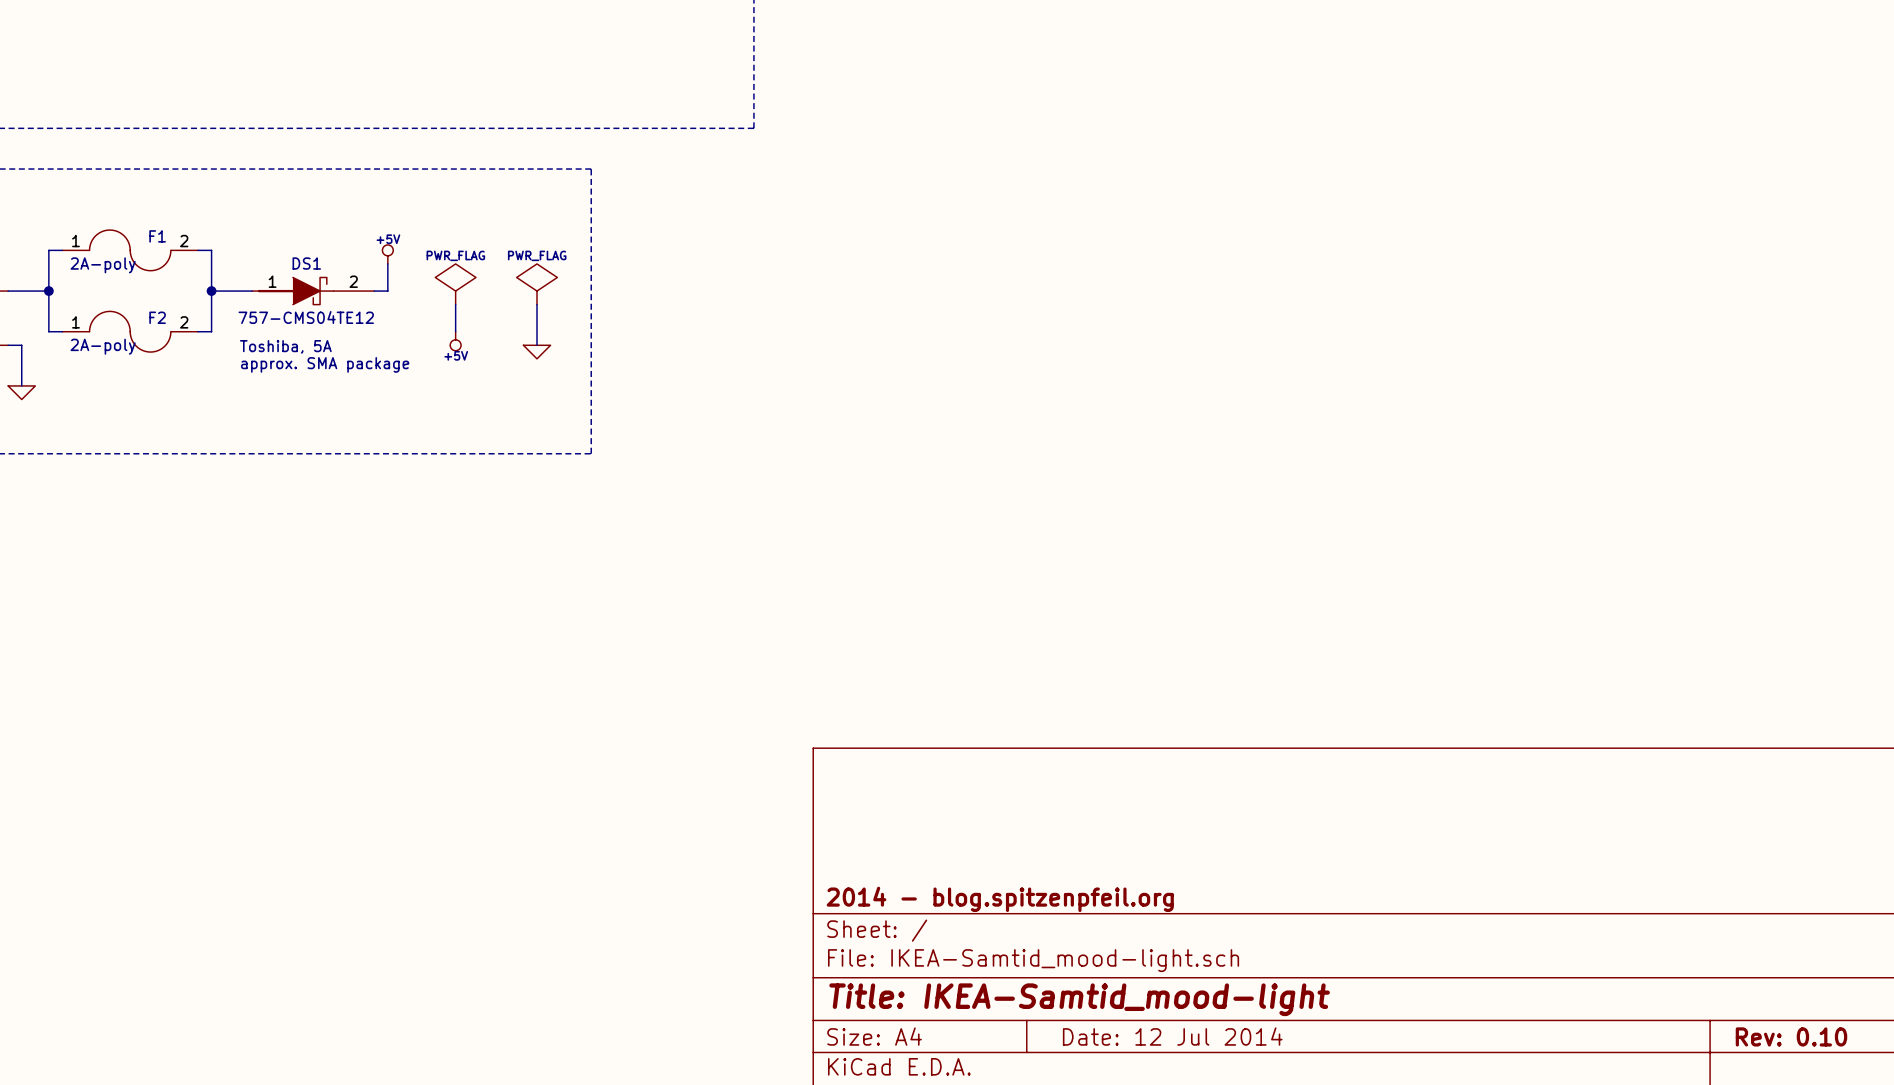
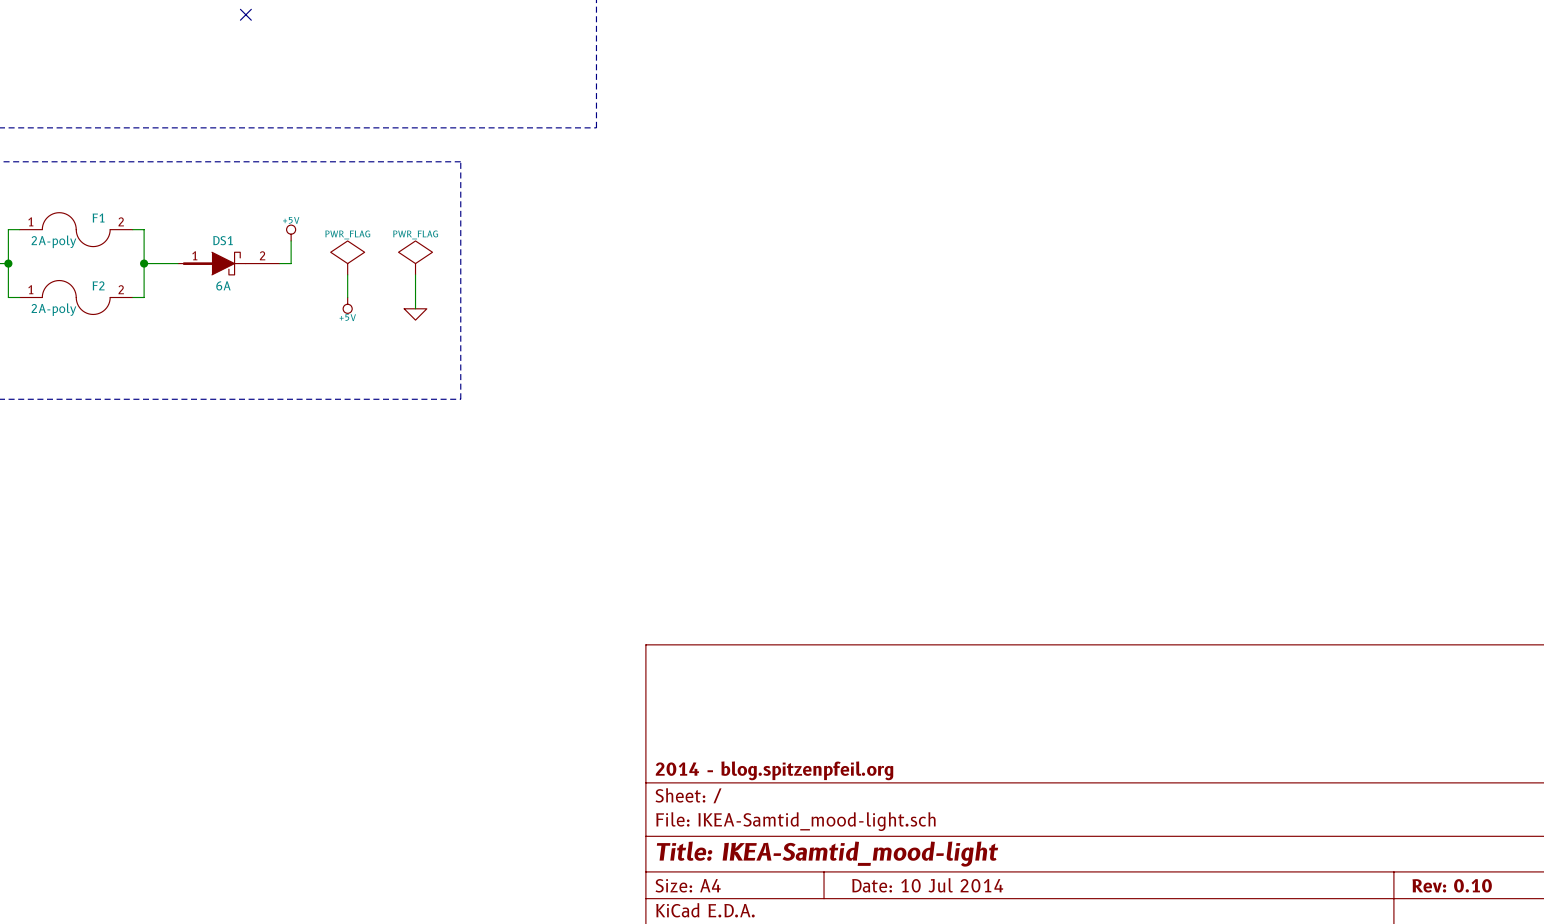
DS1 value: 757-CMS04TE12 (306, 317) -> 6A (223, 285)
text: Toshiba, 5A (285, 346) -> none
text: approx. SMA package (325, 364) -> none
title block: Date: 12 Jul 2014 (1172, 1036) -> Date: 10 Jul 2014 (927, 885)

